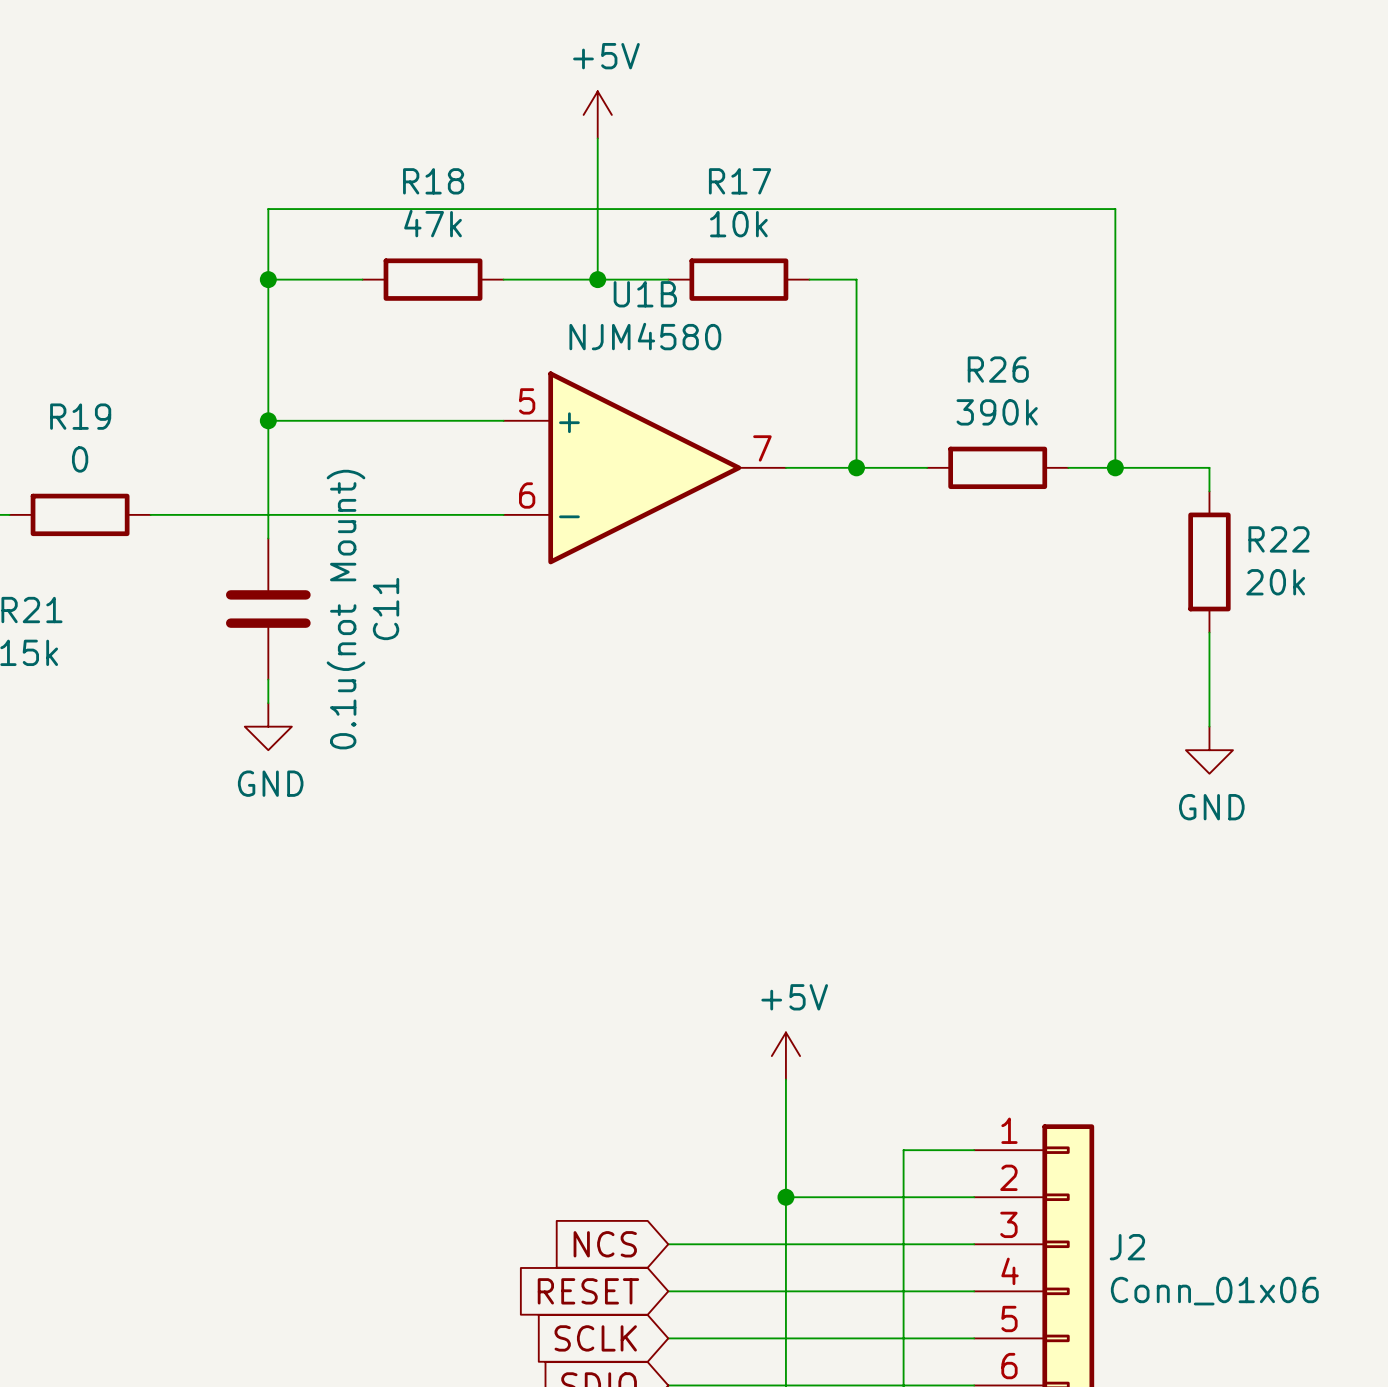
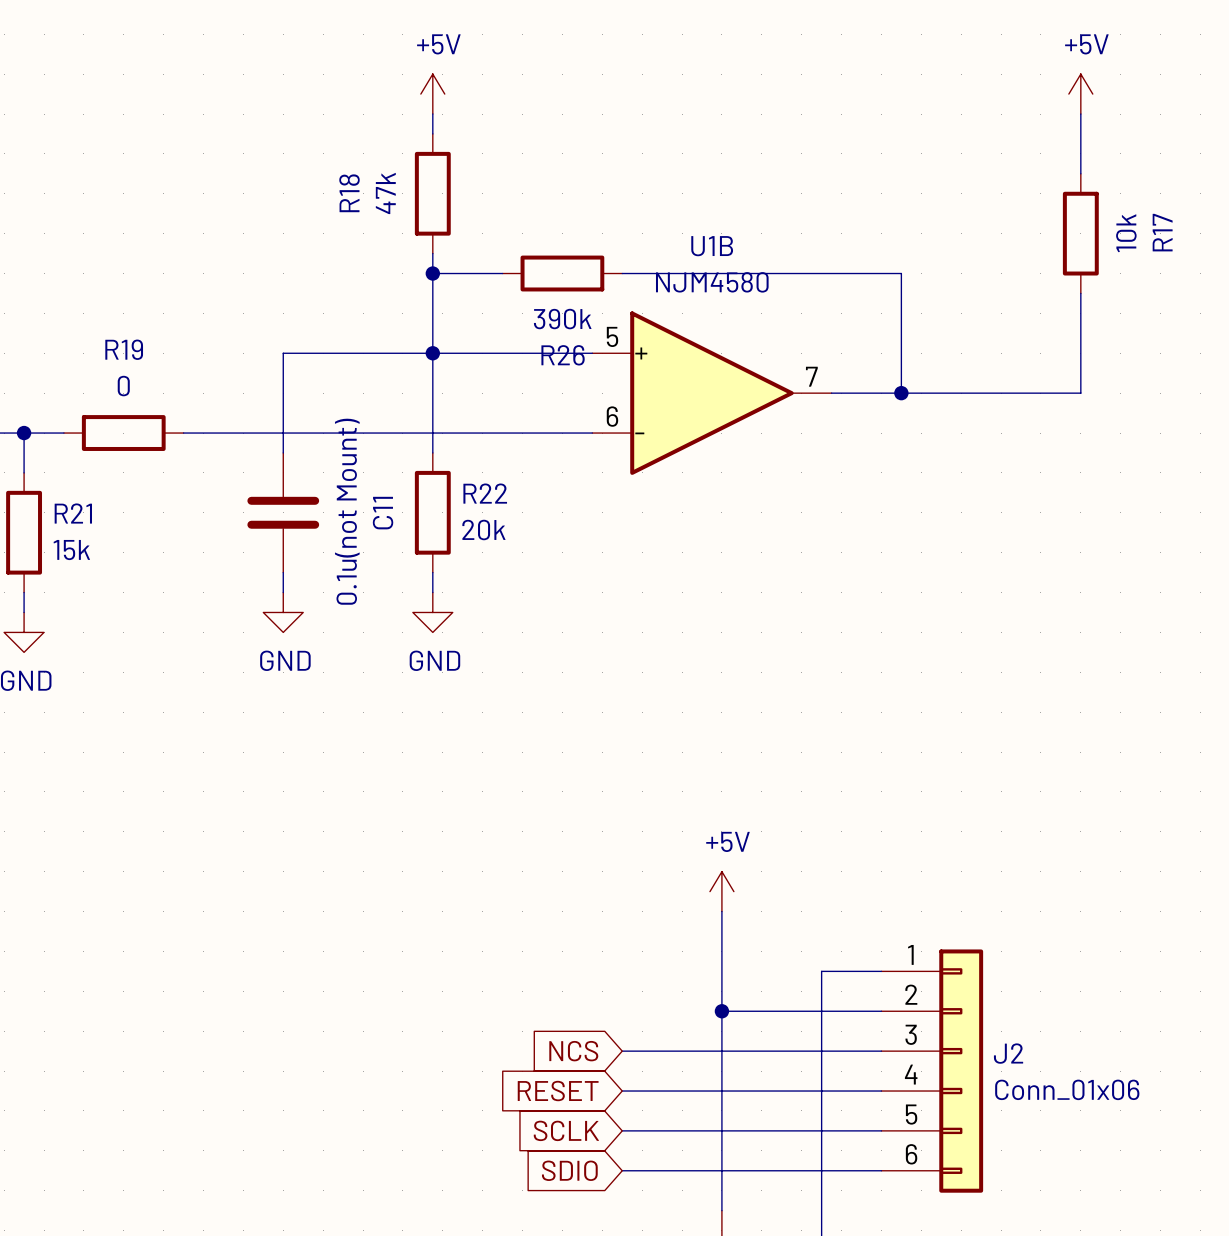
power symbol position: +5V (597, 114) -> +5V (432, 94)
power symbol: none -> +5V (1080, 94)
wire: none -> (432, 114) (432, 133)
wire: (597, 138) (597, 279) -> none
wire: none -> (1080, 114) (1080, 173)
R18 name position: R18 (433, 181) -> R18 (349, 193)
R18 value position: 47k (433, 223) -> 47k (385, 193)
wire: (268, 279) (362, 279) -> none
junction: (268, 279) -> none
R18 rotation: 0° (433, 279) -> 90° clockwise (432, 193)
wire: (503, 279) (668, 279) -> none
junction: (597, 279) -> none
R17 rotation: 0° (738, 279) -> 90° clockwise (1080, 233)
R17 position: (738, 279) -> (1080, 233)
wire: (809, 279) (856, 279) (856, 467) -> none
wire: none -> (432, 253) (432, 452)
wire: none -> (432, 273) (502, 273)
junction: none -> (432, 273)
wire: none -> (622, 273) (901, 273) (901, 393)
R26 name position: R26 (998, 369) -> R26 (563, 355)
R26 value position: 390k (997, 412) -> 390k (562, 319)
wire: (268, 420) (268, 209) (1115, 209) (1115, 467) -> none
junction: (268, 420) -> none
junction: none -> (432, 353)
U1B position: (644, 467) -> (711, 393)
junction: (856, 467) -> none
wire: none -> (841, 393) (961, 393)
junction: none -> (901, 393)
R26 position: (997, 467) -> (562, 273)
junction: (1115, 467) -> none
wire: (1209, 467) (1209, 491) -> (1080, 393) (1080, 293)
R22 position: (1209, 561) -> (432, 512)
wire: (1209, 632) (1209, 726) -> none
wire: none -> (432, 572) (432, 592)
power symbol: none -> GND (432, 612)
power symbol: GND (1209, 750) -> none

